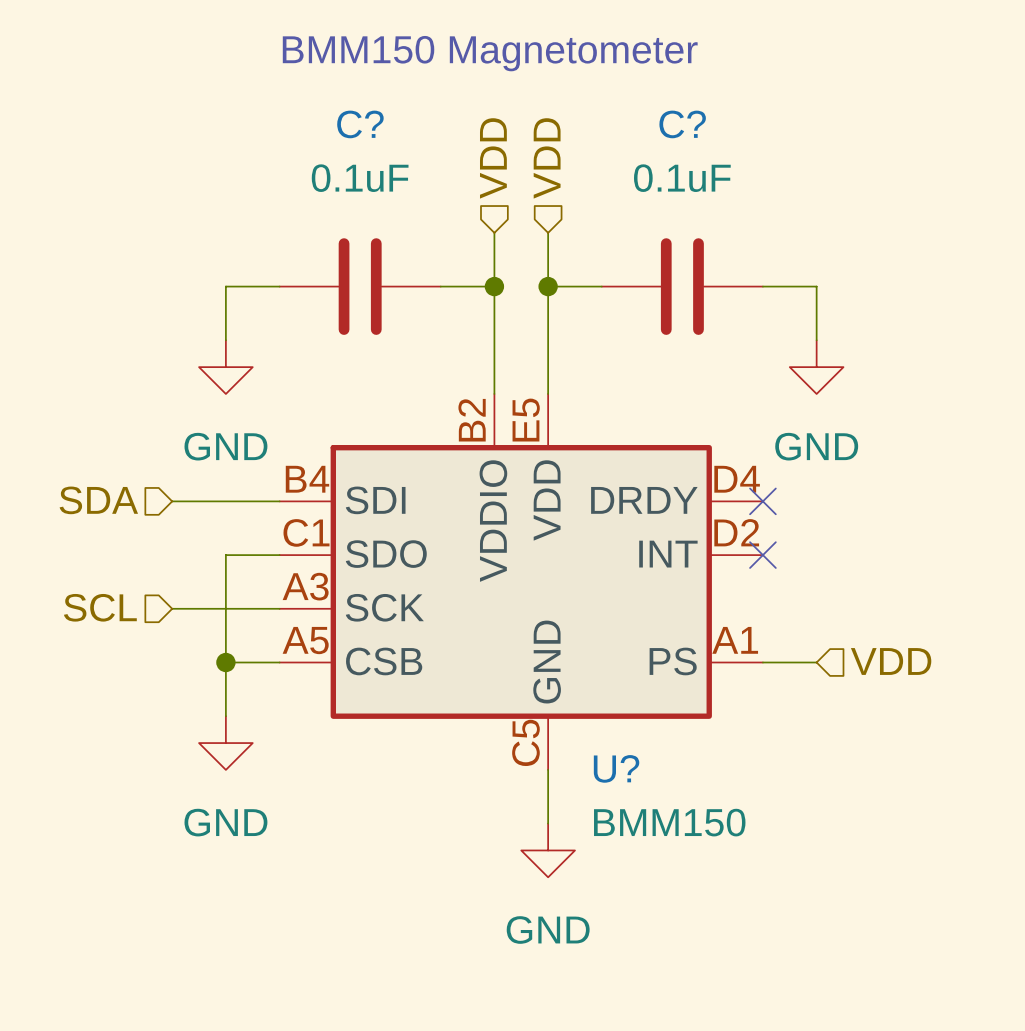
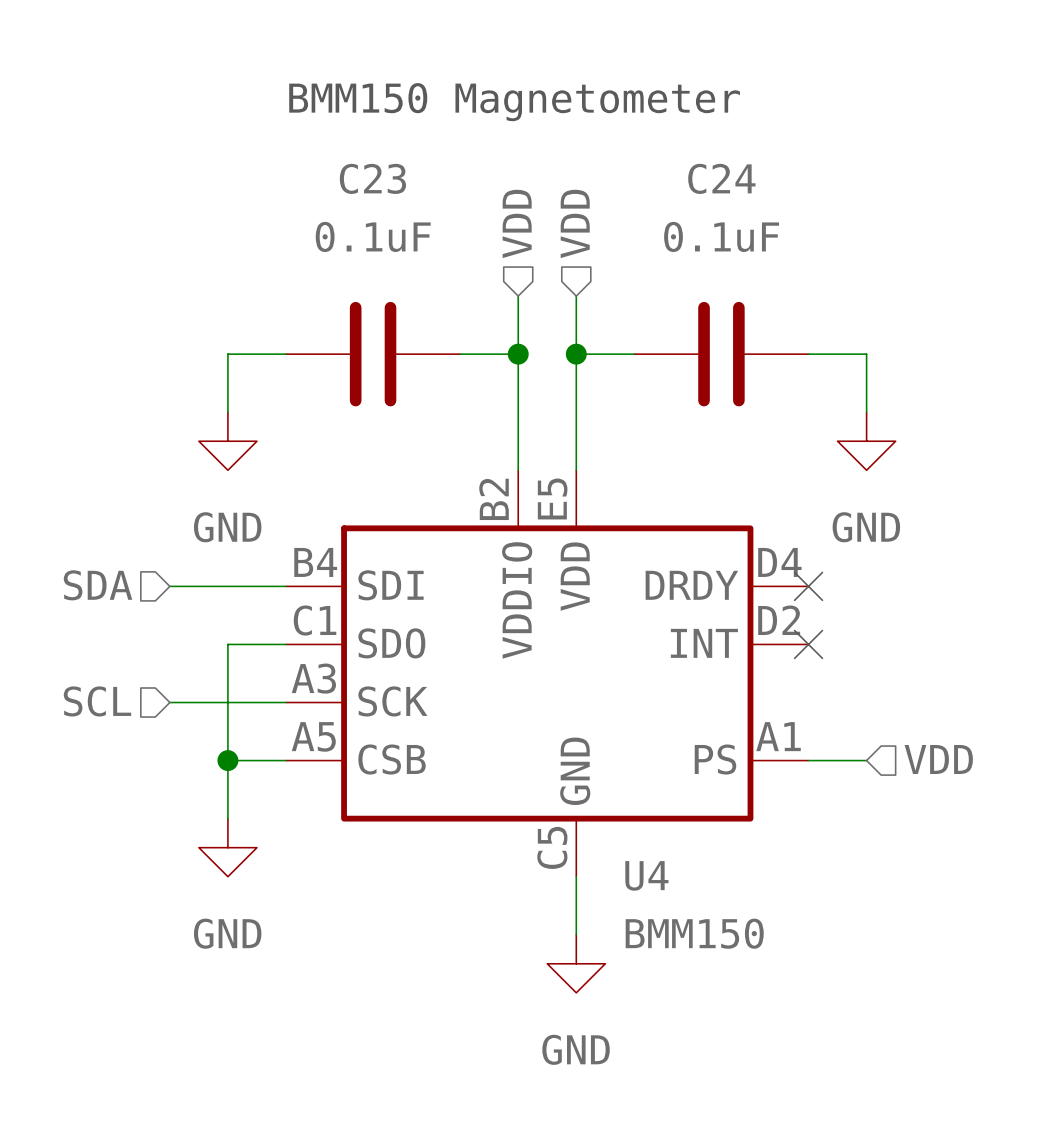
C? name: C? (360, 124) -> C23 (372, 178)
C? name: C? (682, 124) -> C24 (721, 178)
U? name: U? (616, 768) -> U4 (646, 875)

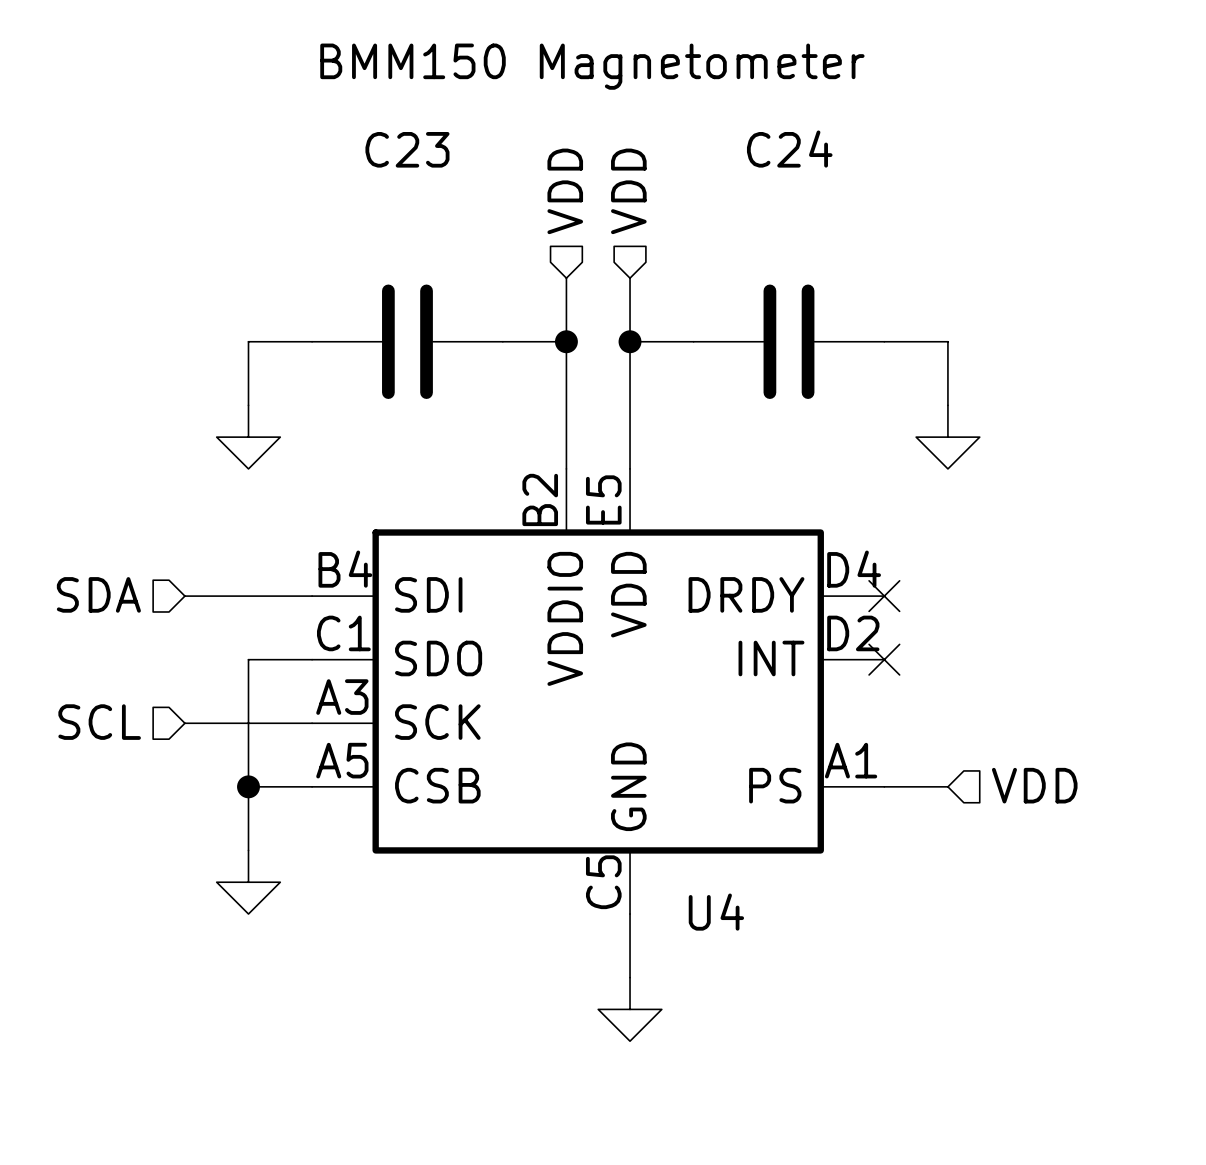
C23 value: 0.1uF (373, 236) -> none
C24 value: 0.1uF (721, 236) -> none
power symbol text: GND (227, 527) -> none
power symbol text: GND (866, 527) -> none
power symbol text: GND (227, 933) -> none
U4 value: BMM150 (694, 933) -> none
power symbol text: GND (576, 1049) -> none

